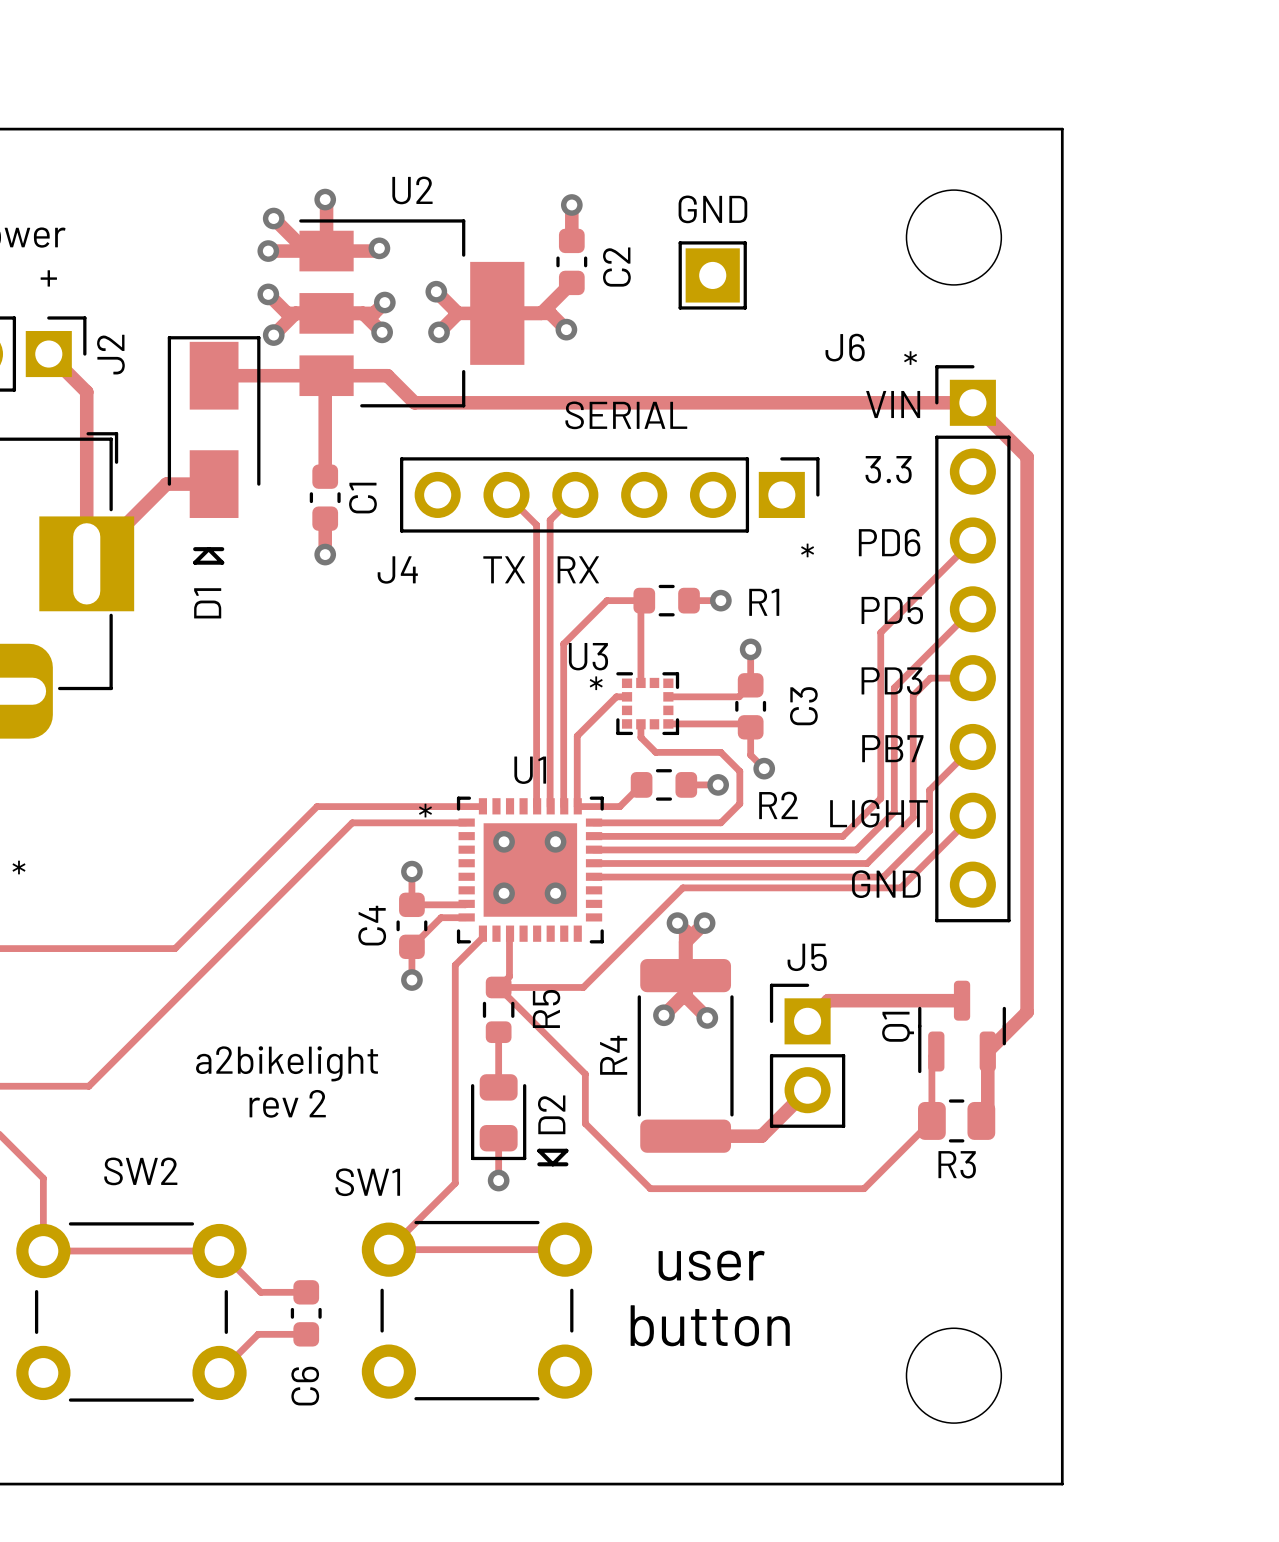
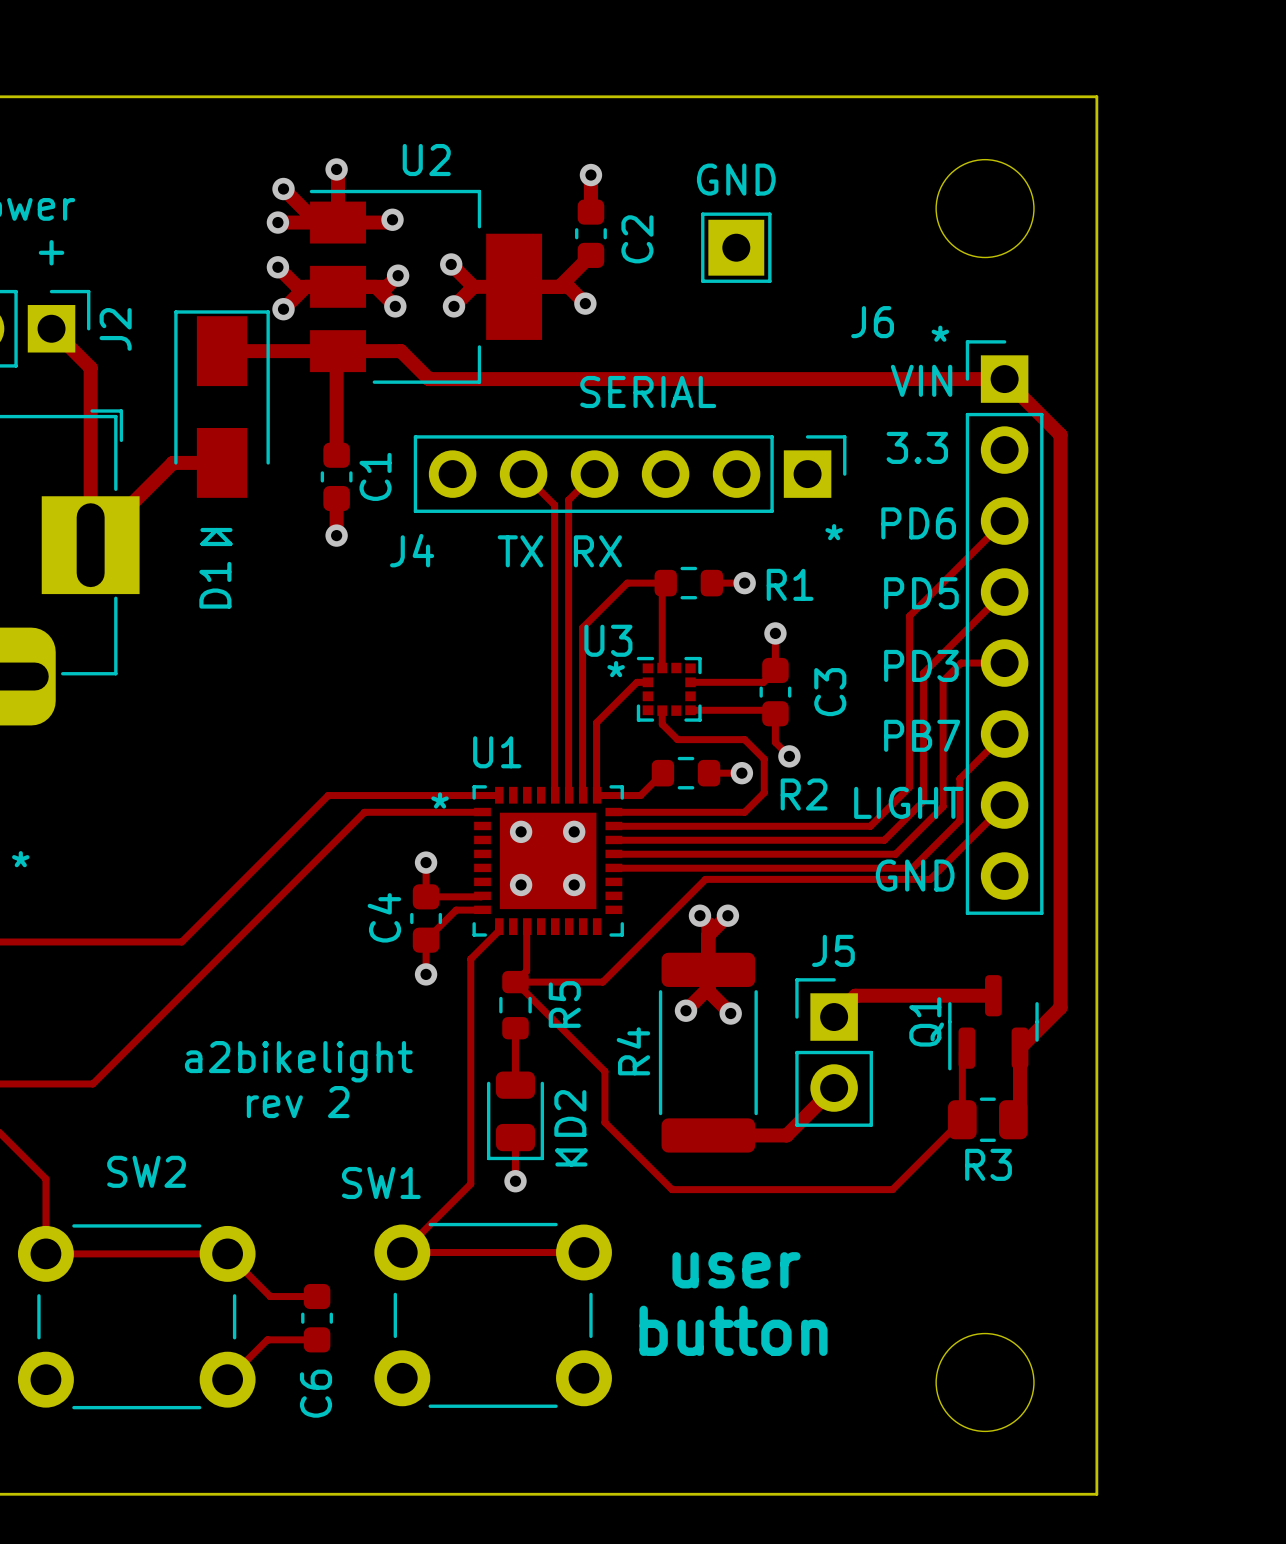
U1 name position: U1 (530, 770) -> U1 (497, 752)

